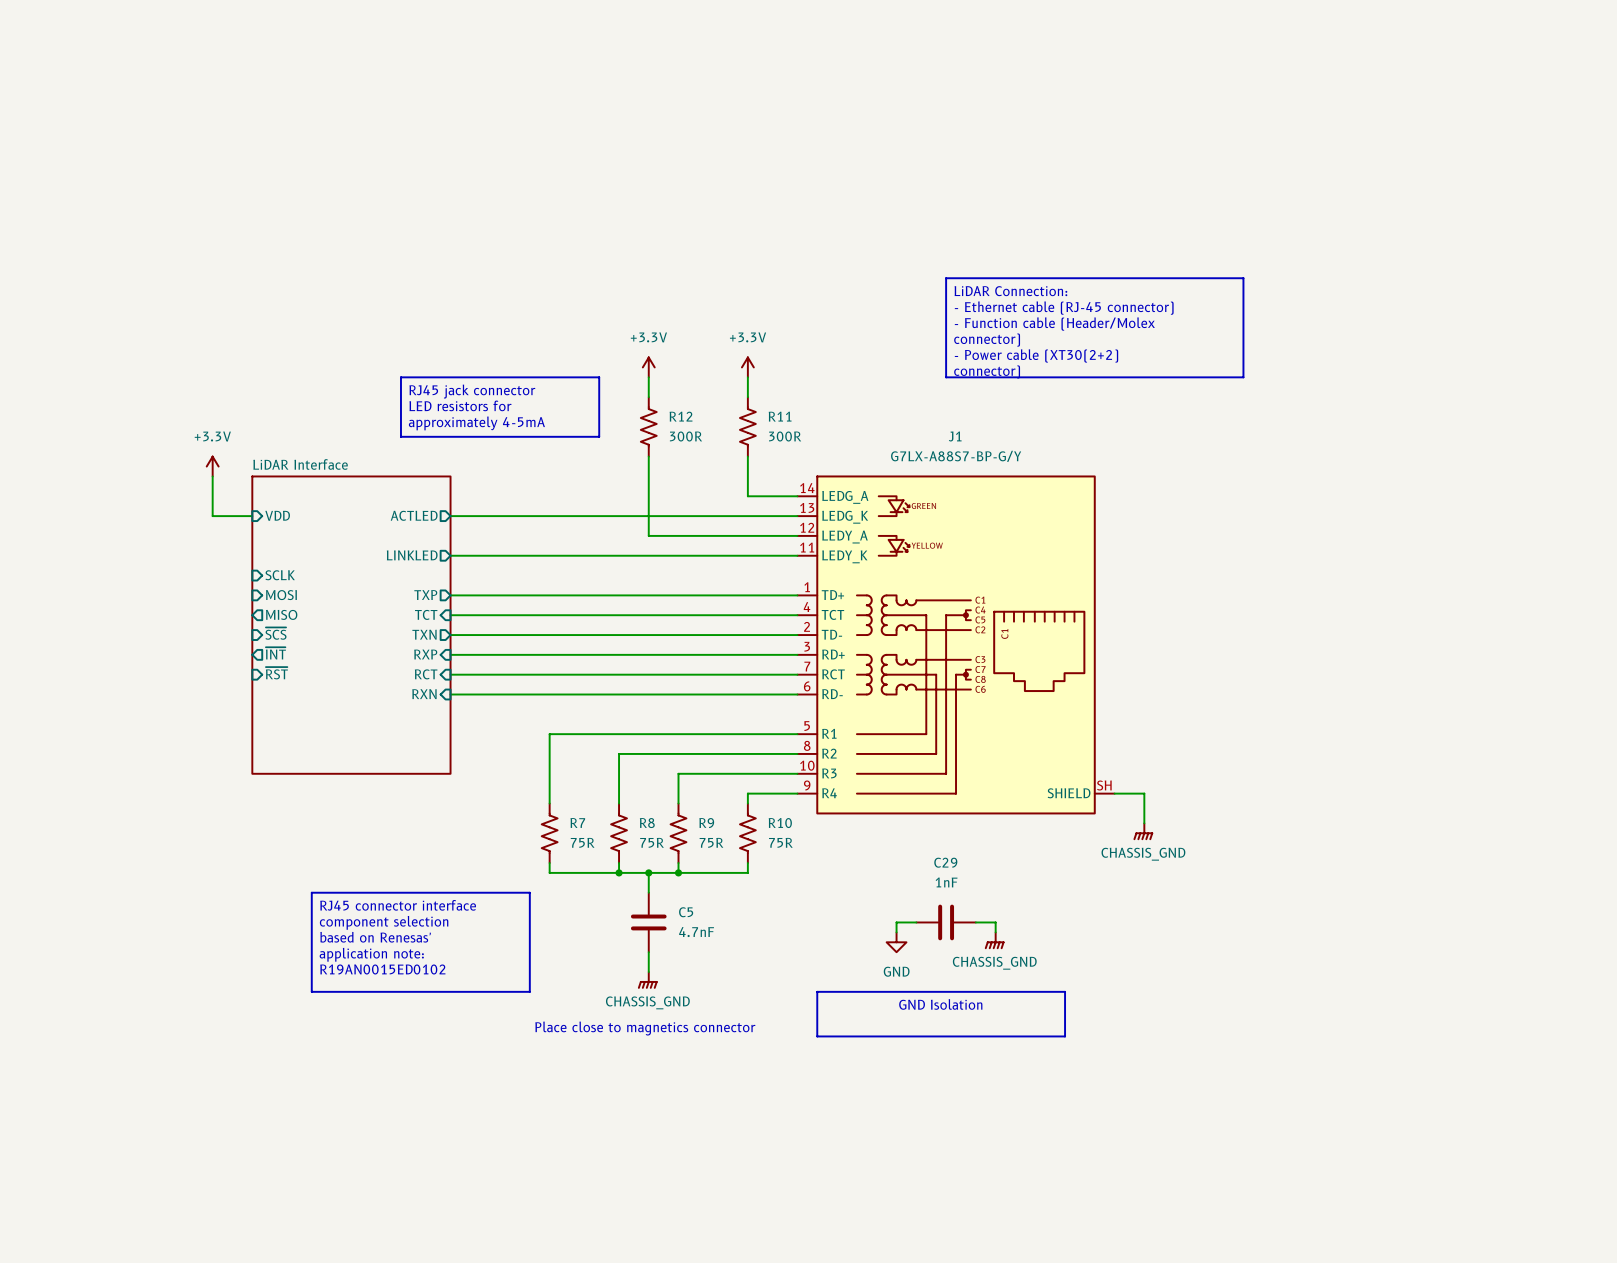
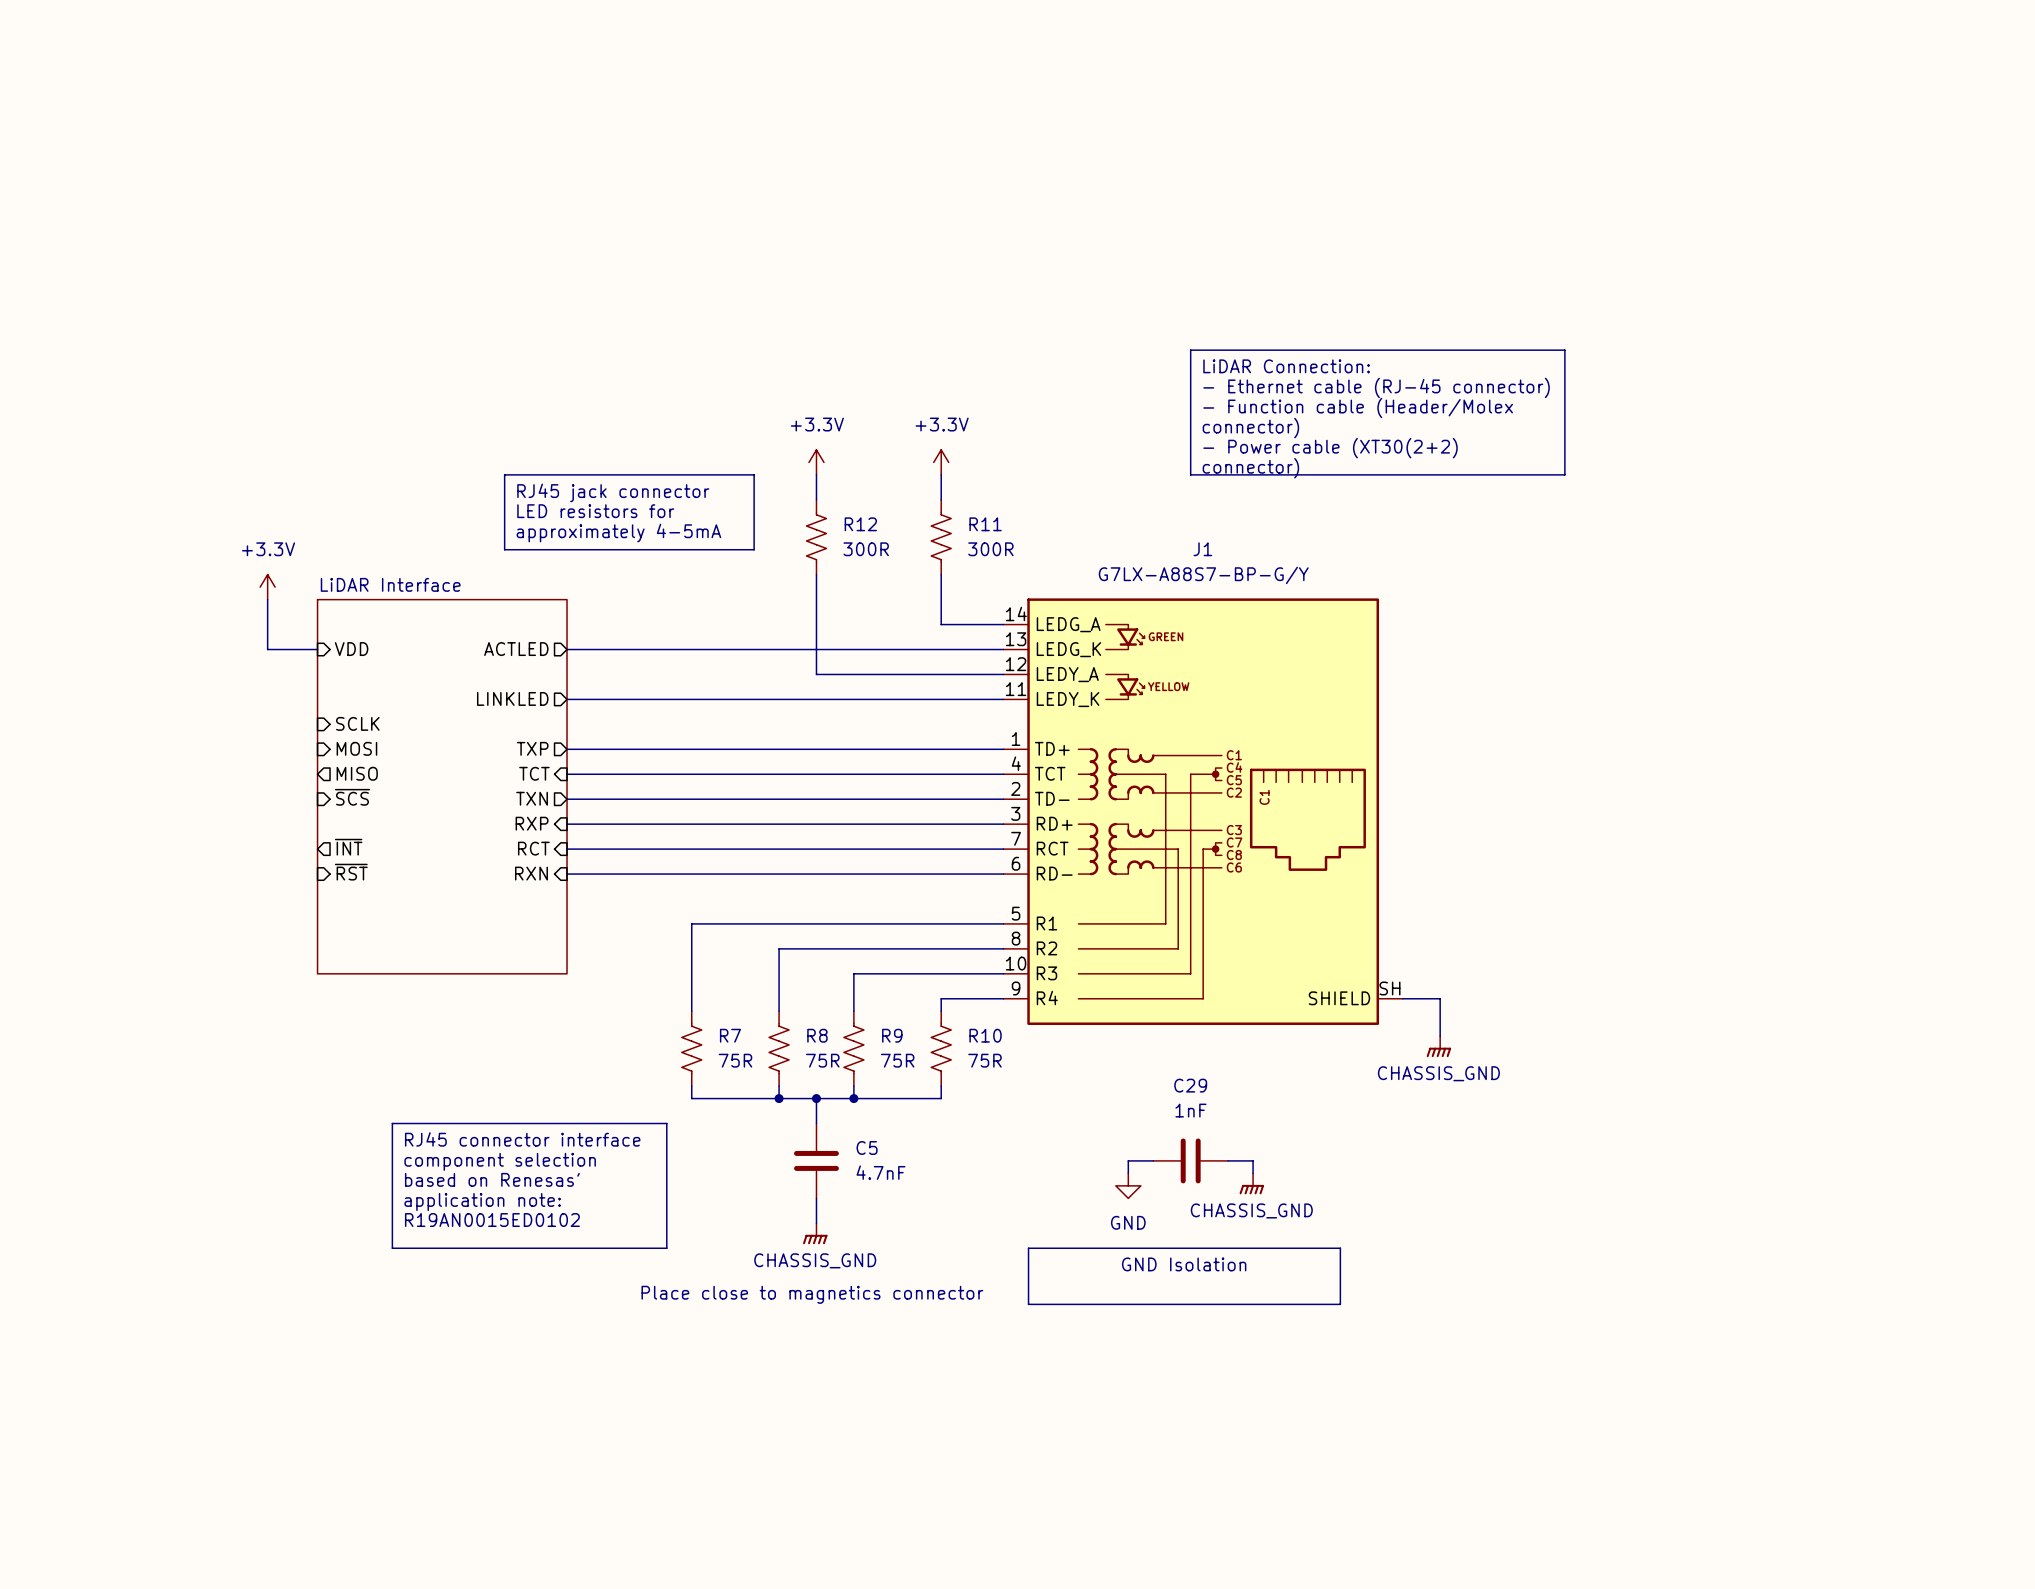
sheet pin: ~{INT} (275, 653) -> none
sheet pin shape: input (276, 673) -> output (348, 847)
sheet pin: ~{RST} (276, 673) -> ~{INT} (348, 847)
sheet pin: none -> ~{RST} (351, 872)

